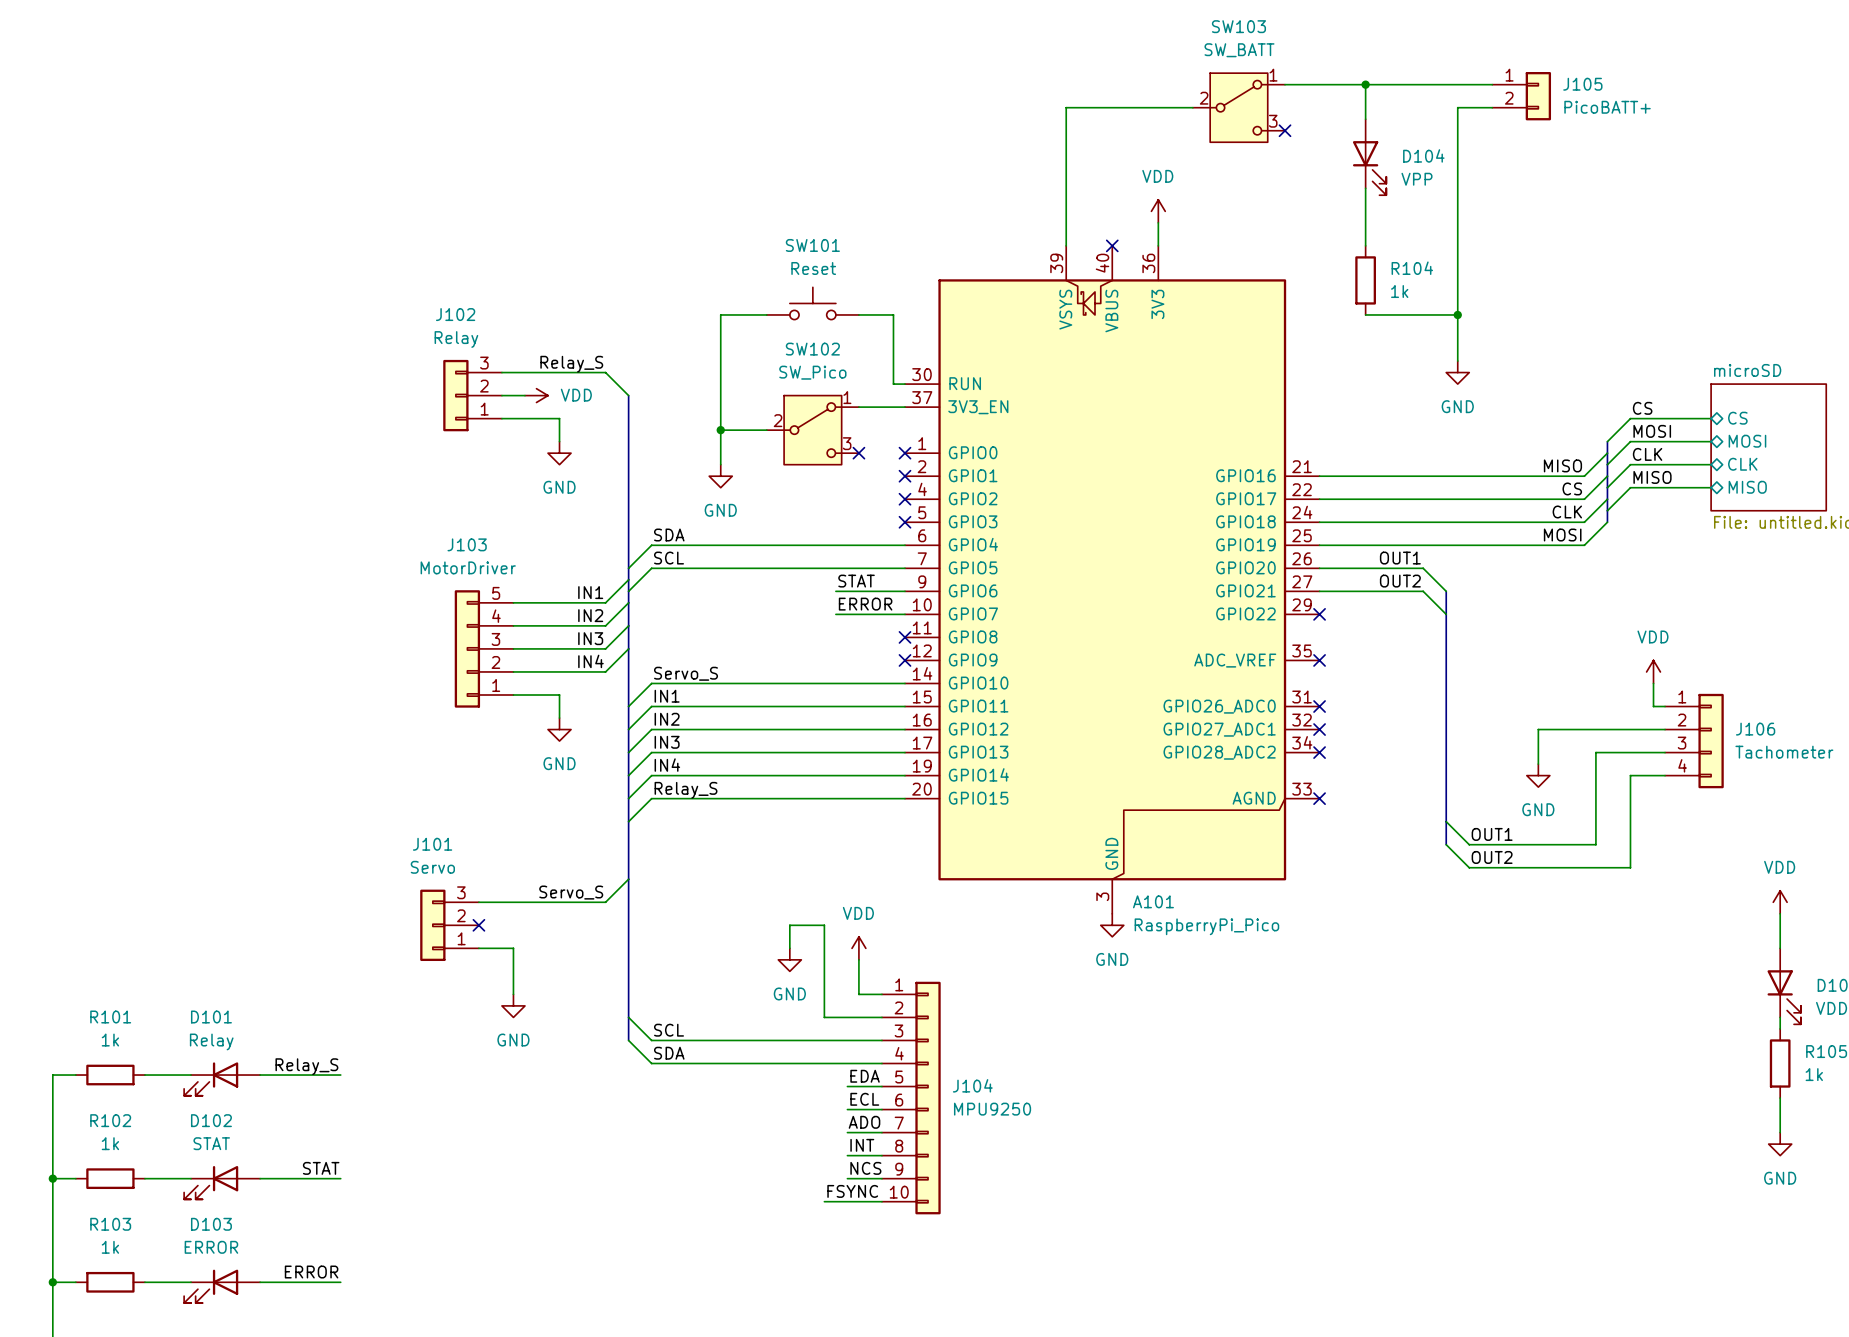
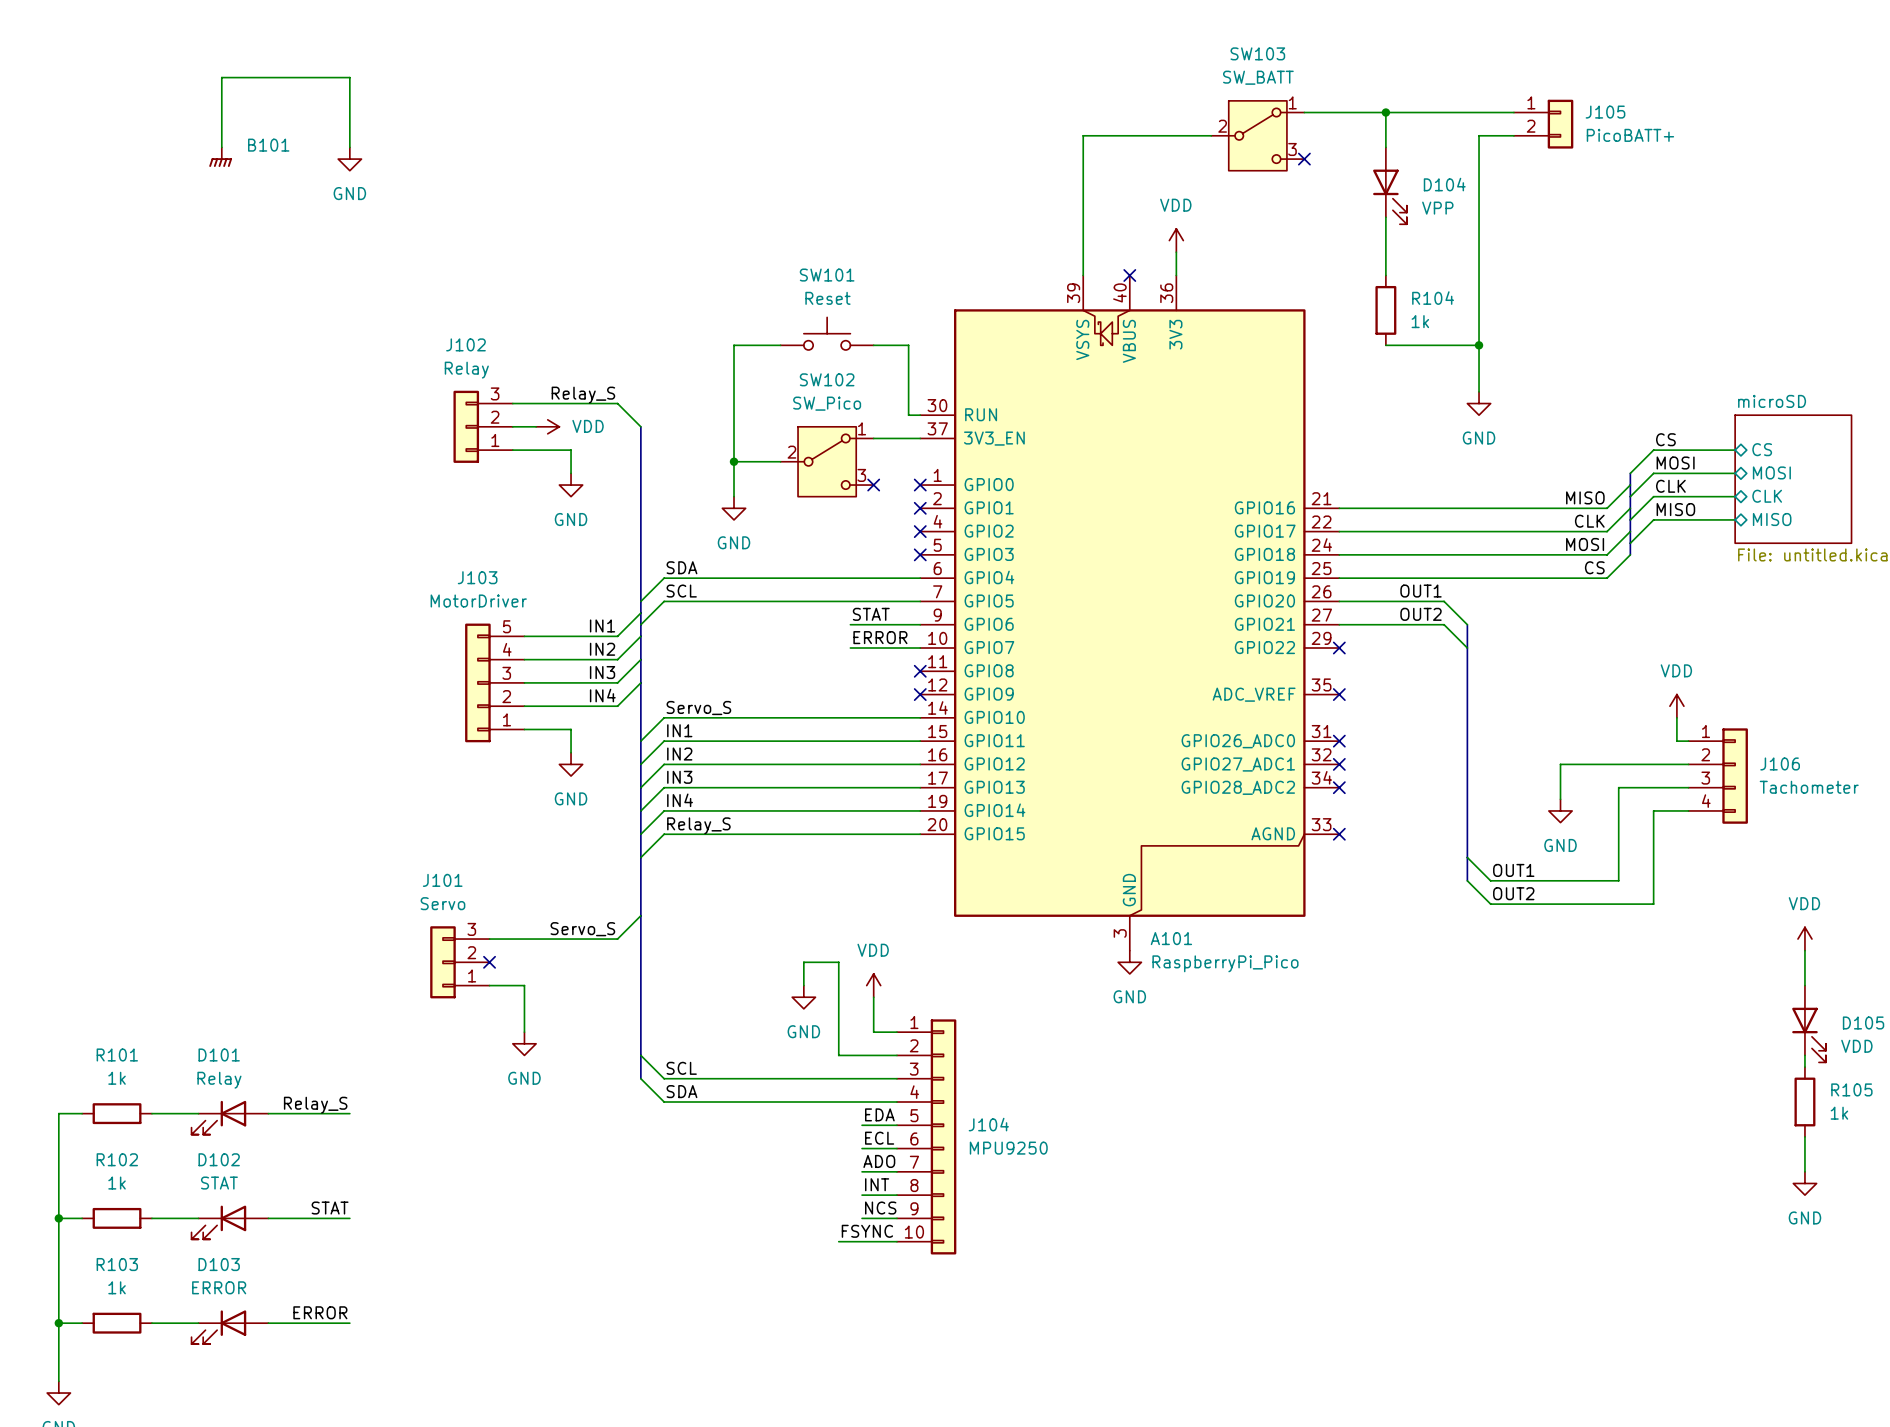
wire: none -> (221, 147) (221, 77) (349, 77) (349, 147)
B101: none -> (220, 157)
power symbol: none -> GND (349, 159)
label: CS (1572, 488) -> CLK (1589, 521)
label: CLK (1567, 511) -> MOSI (1585, 544)
label: MOSI (1562, 535) -> CS (1594, 567)

